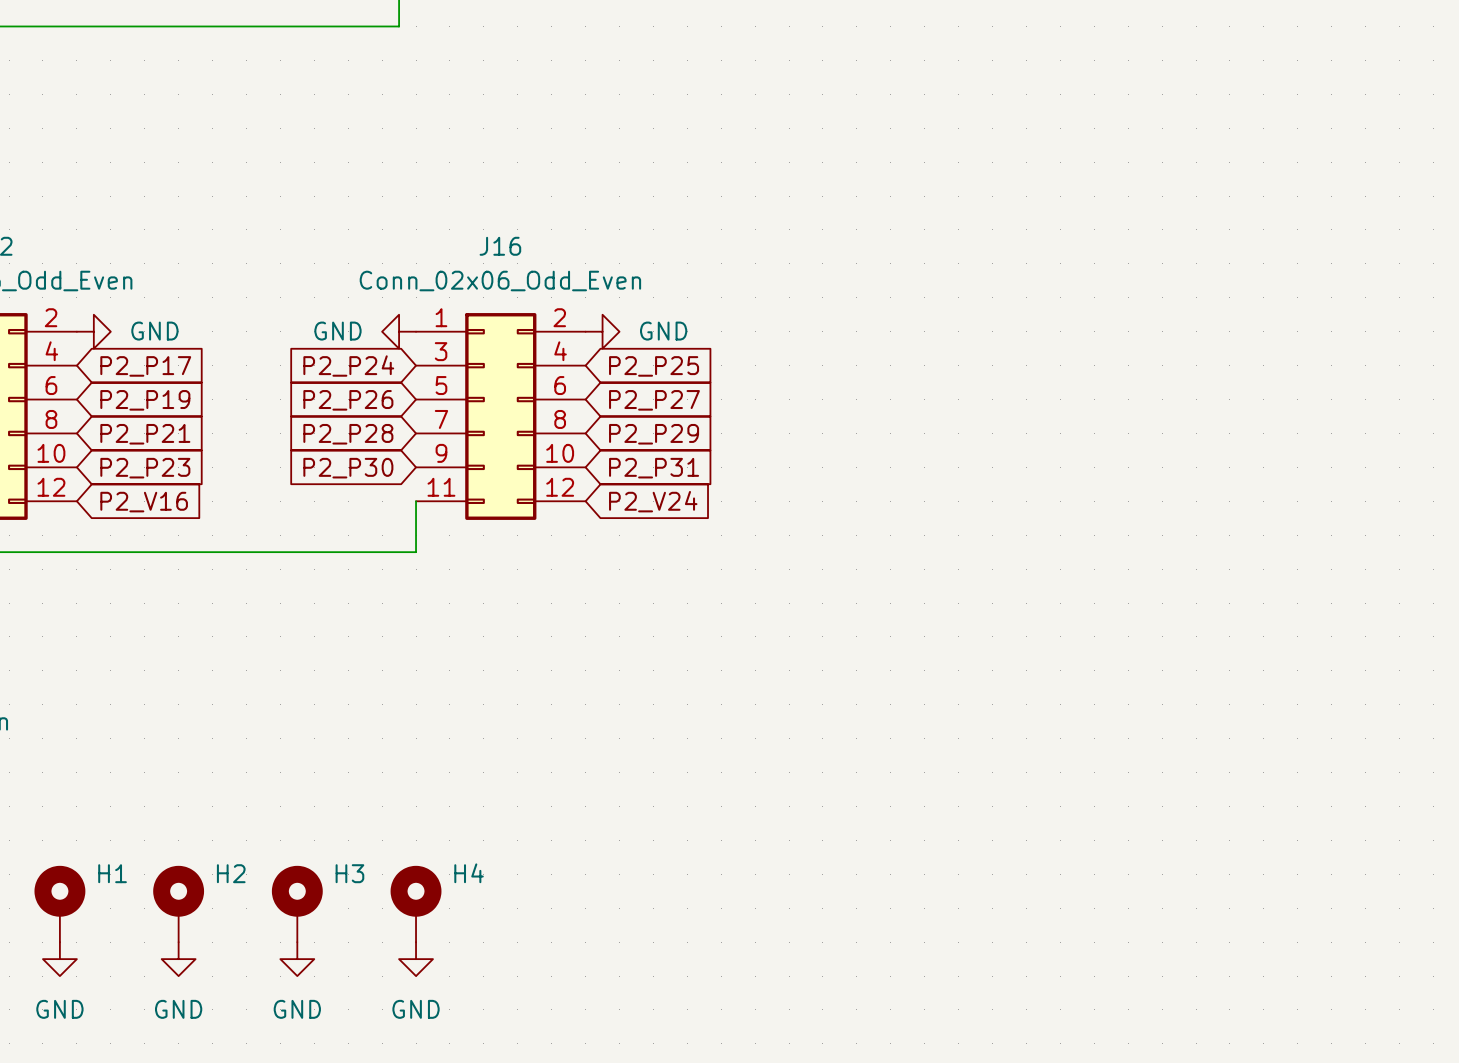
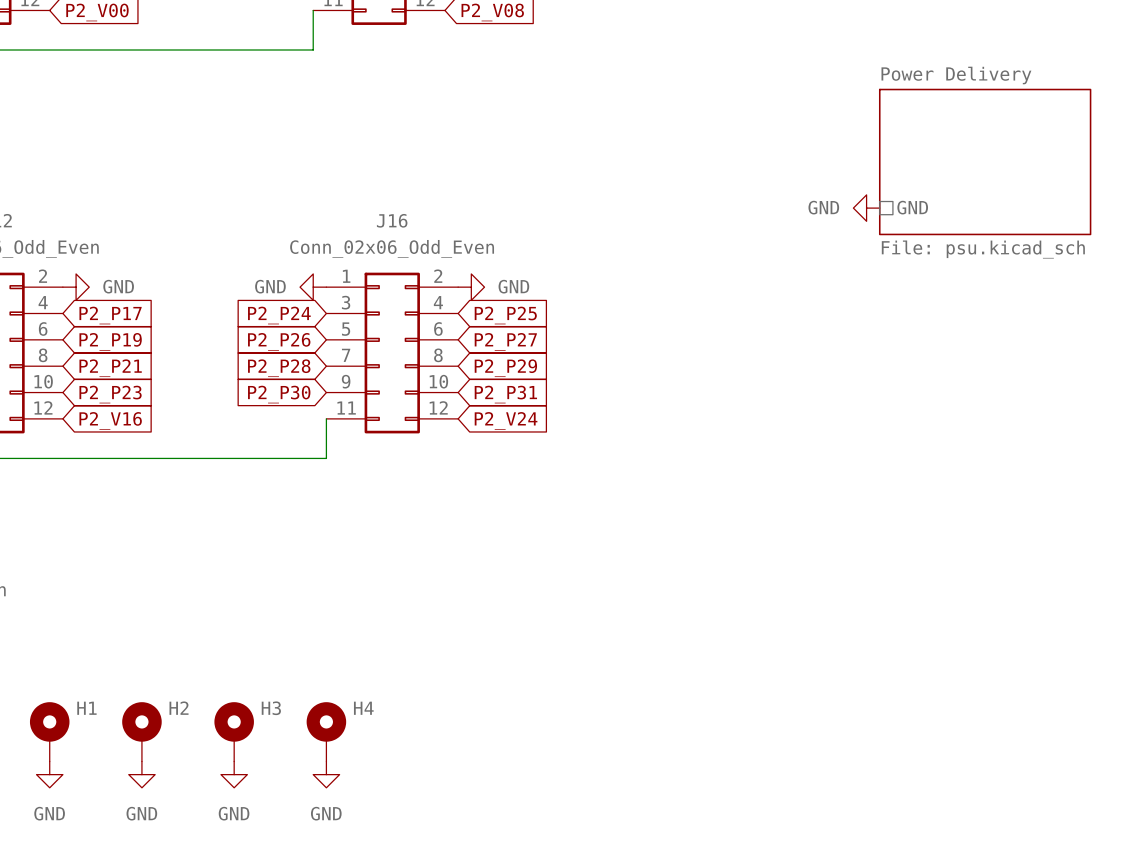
sheet Power Delivery: none -> File: psu.kicad_sch (985, 161)
power symbol: none -> GND (866, 208)
sheet pin: none -> GND (912, 207)

